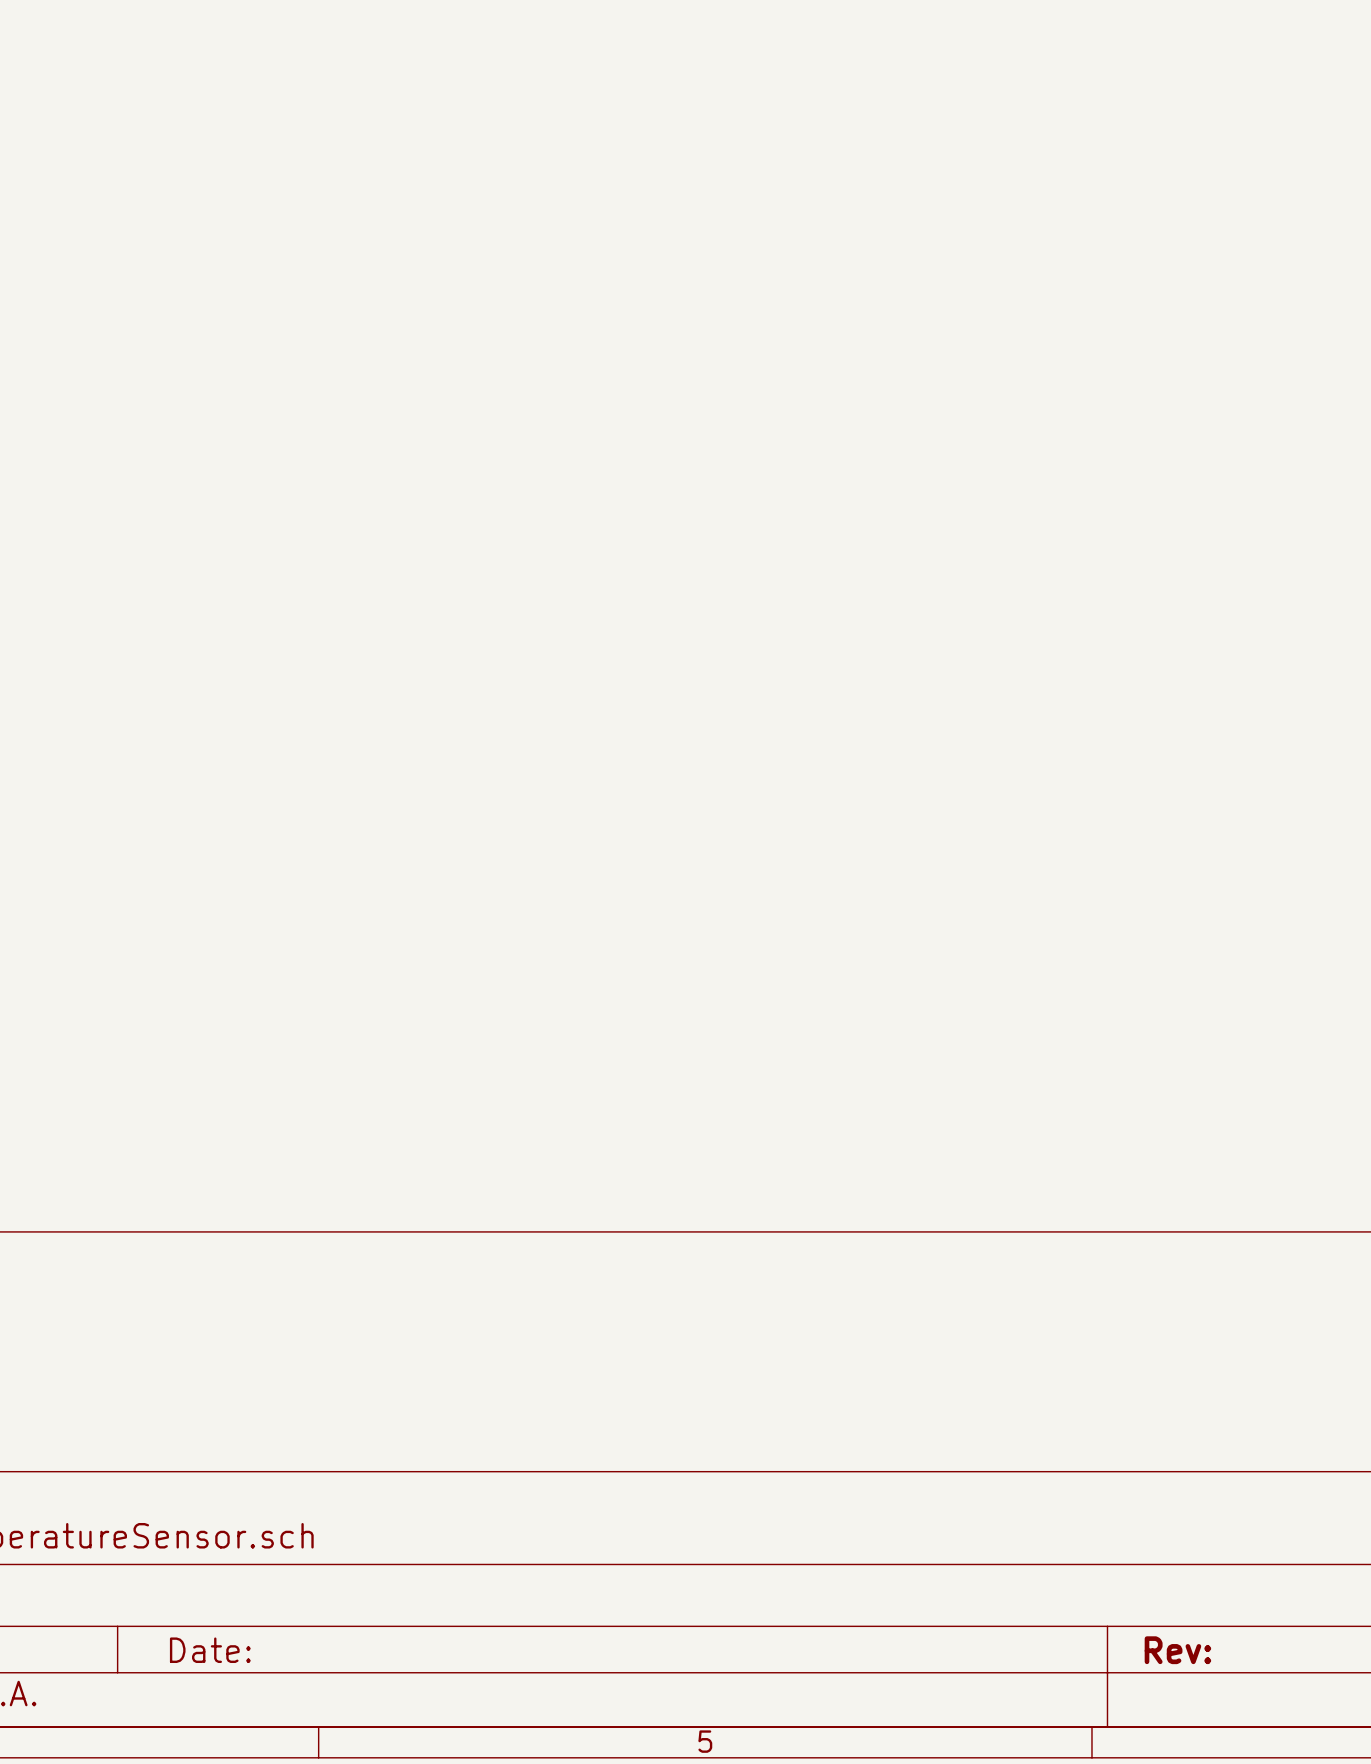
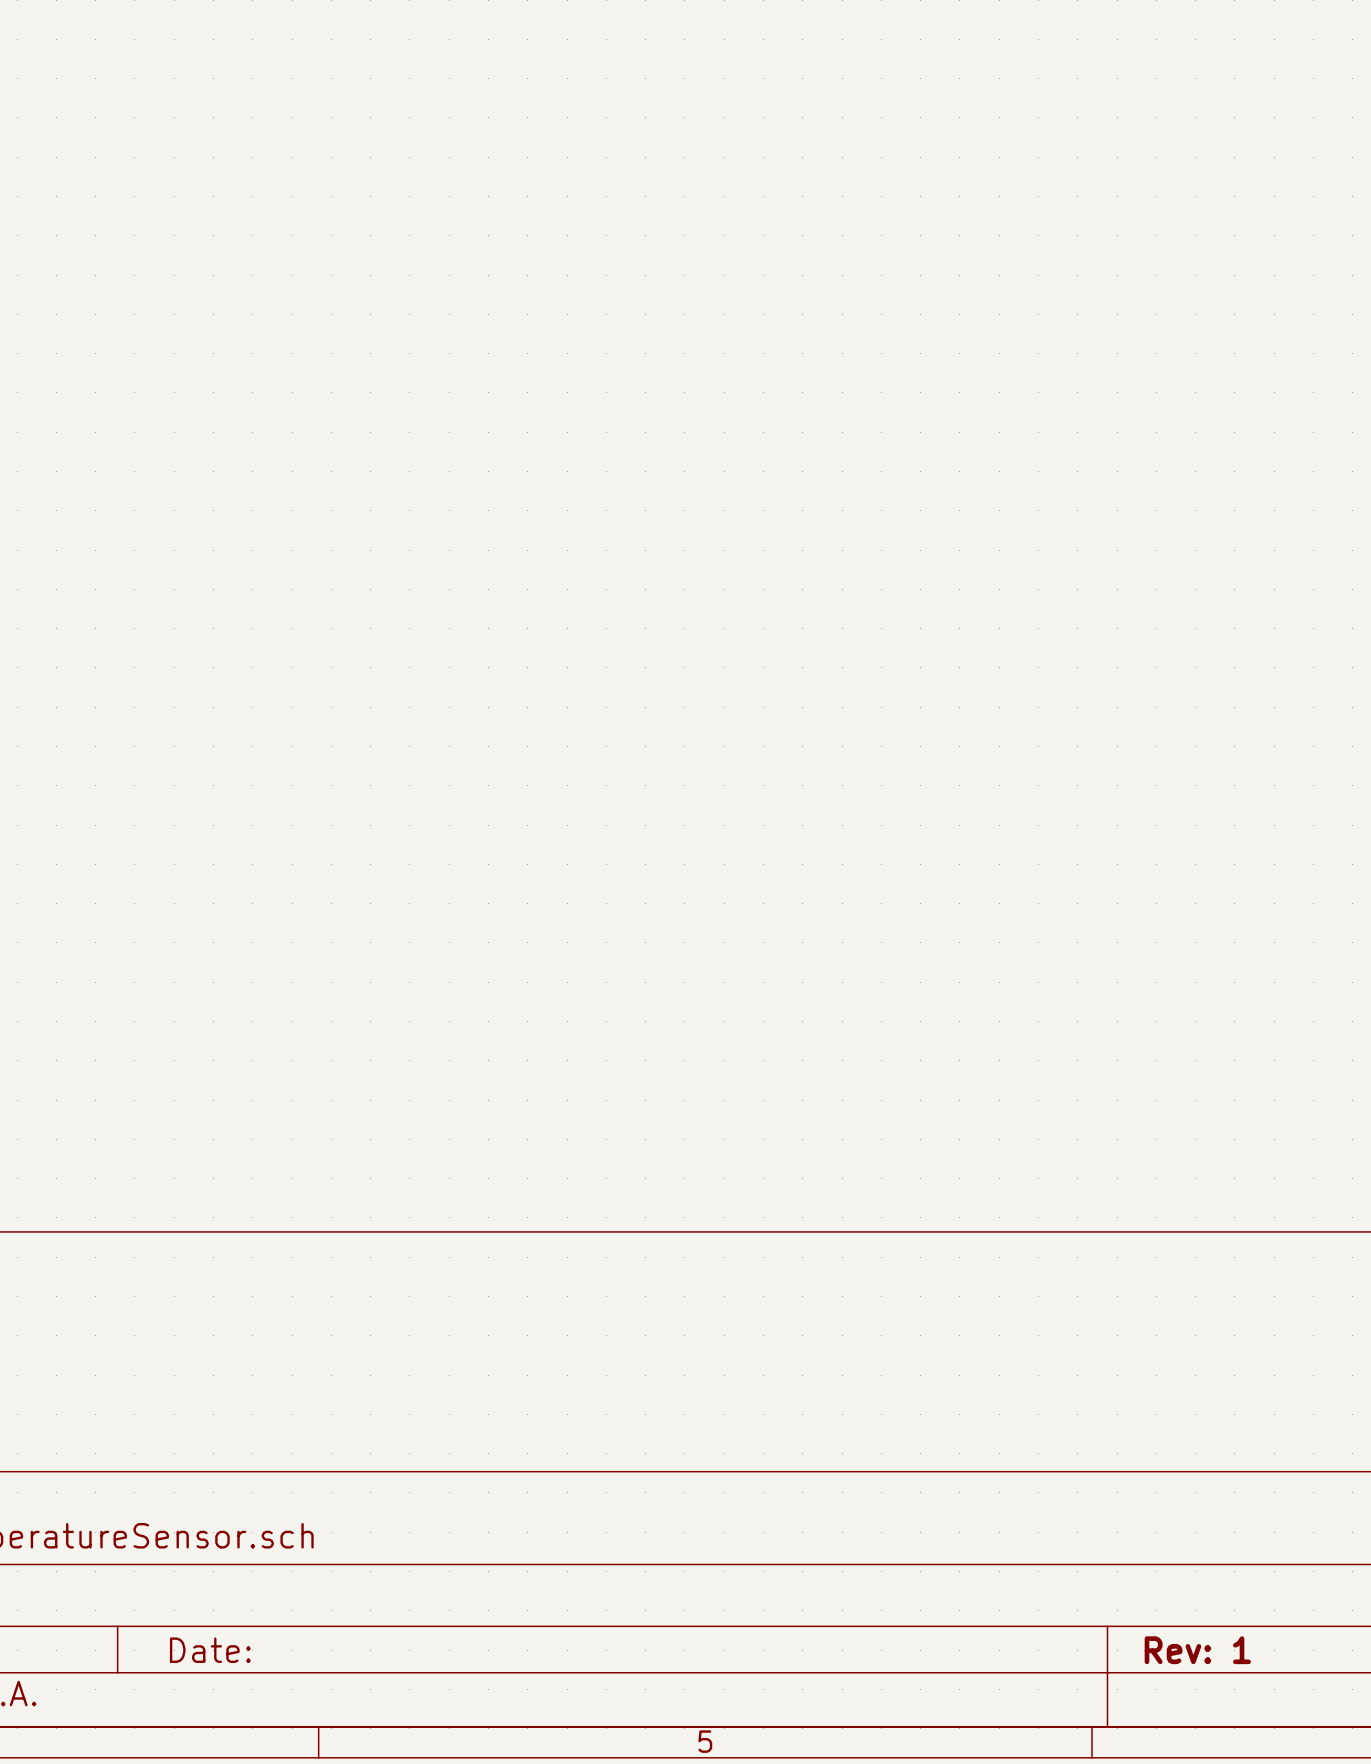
title block: Rev: (1177, 1650) -> Rev: 1 (1197, 1650)

